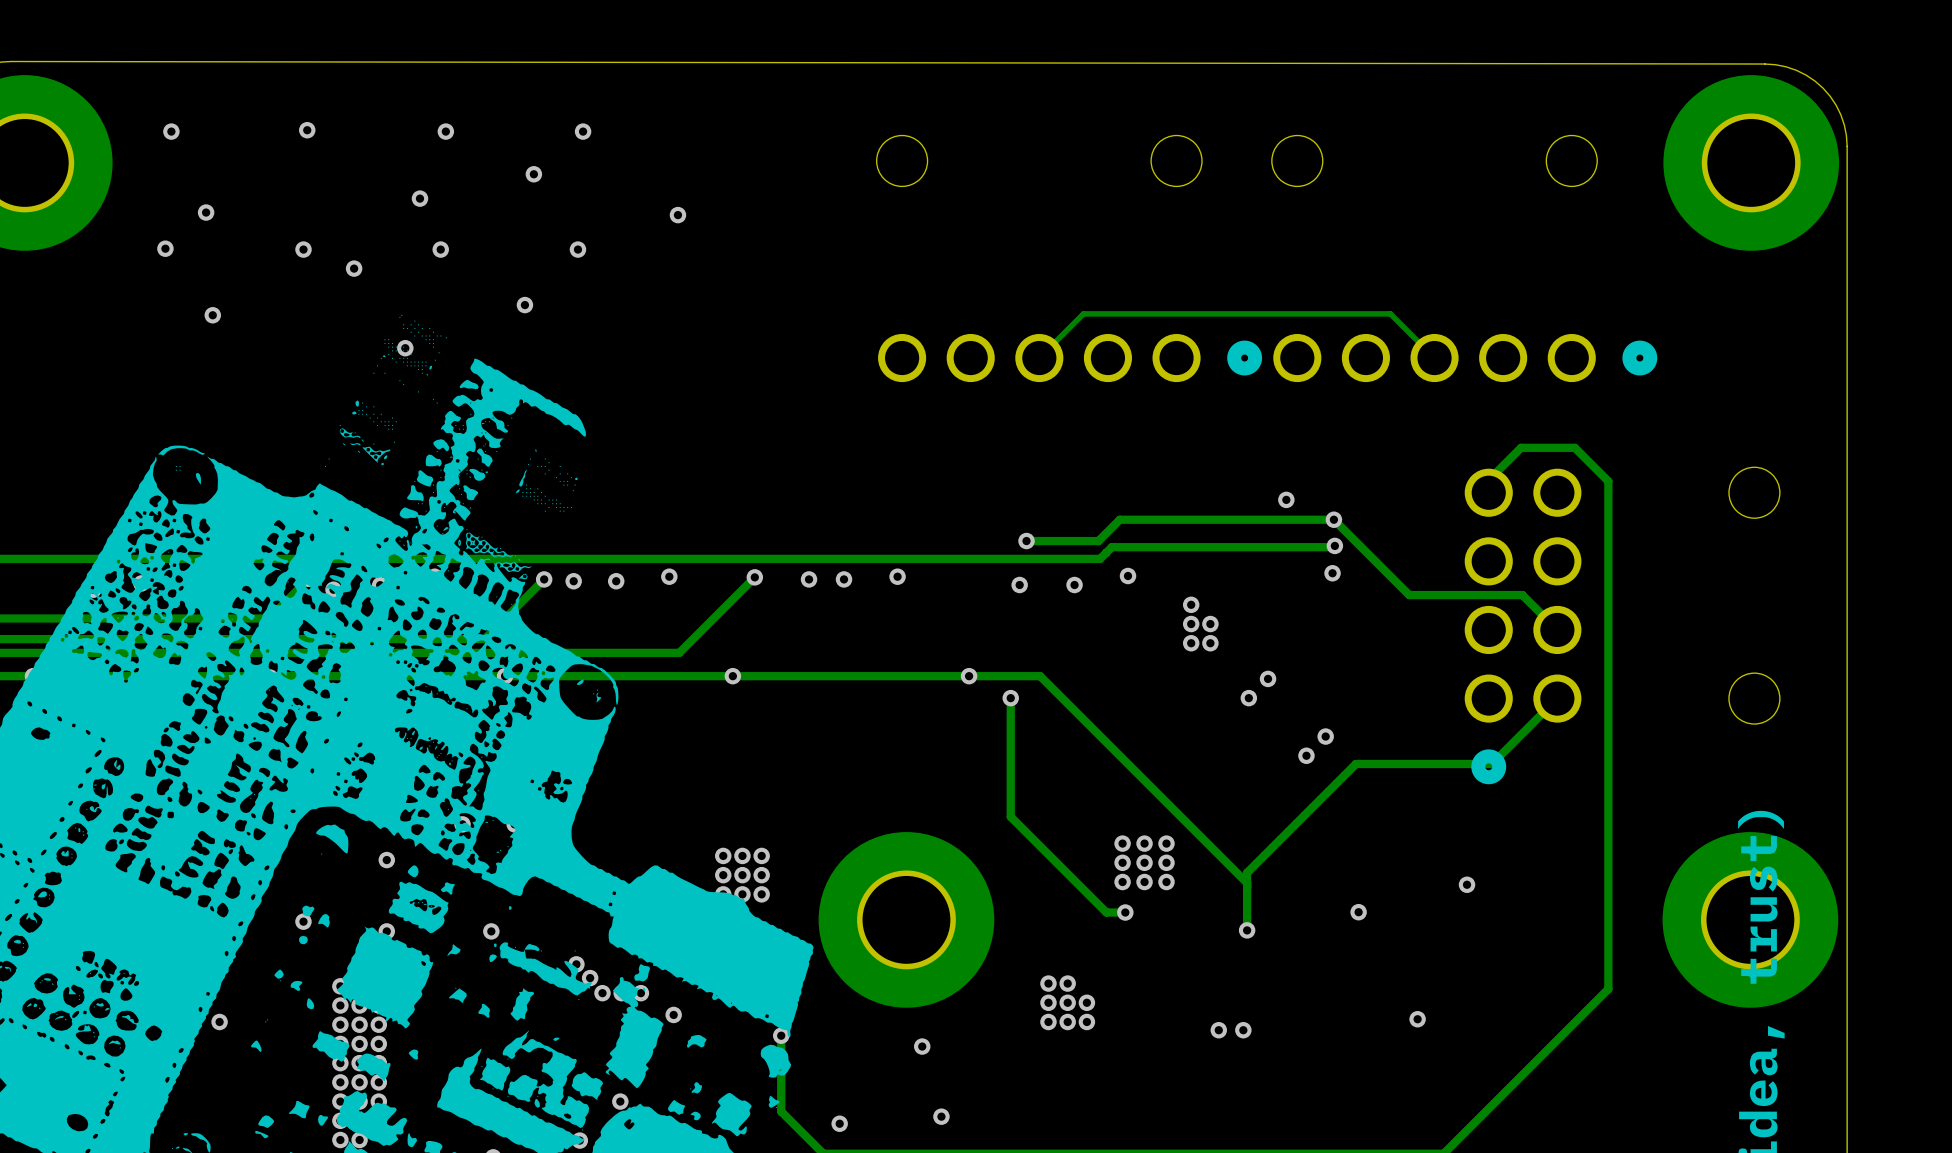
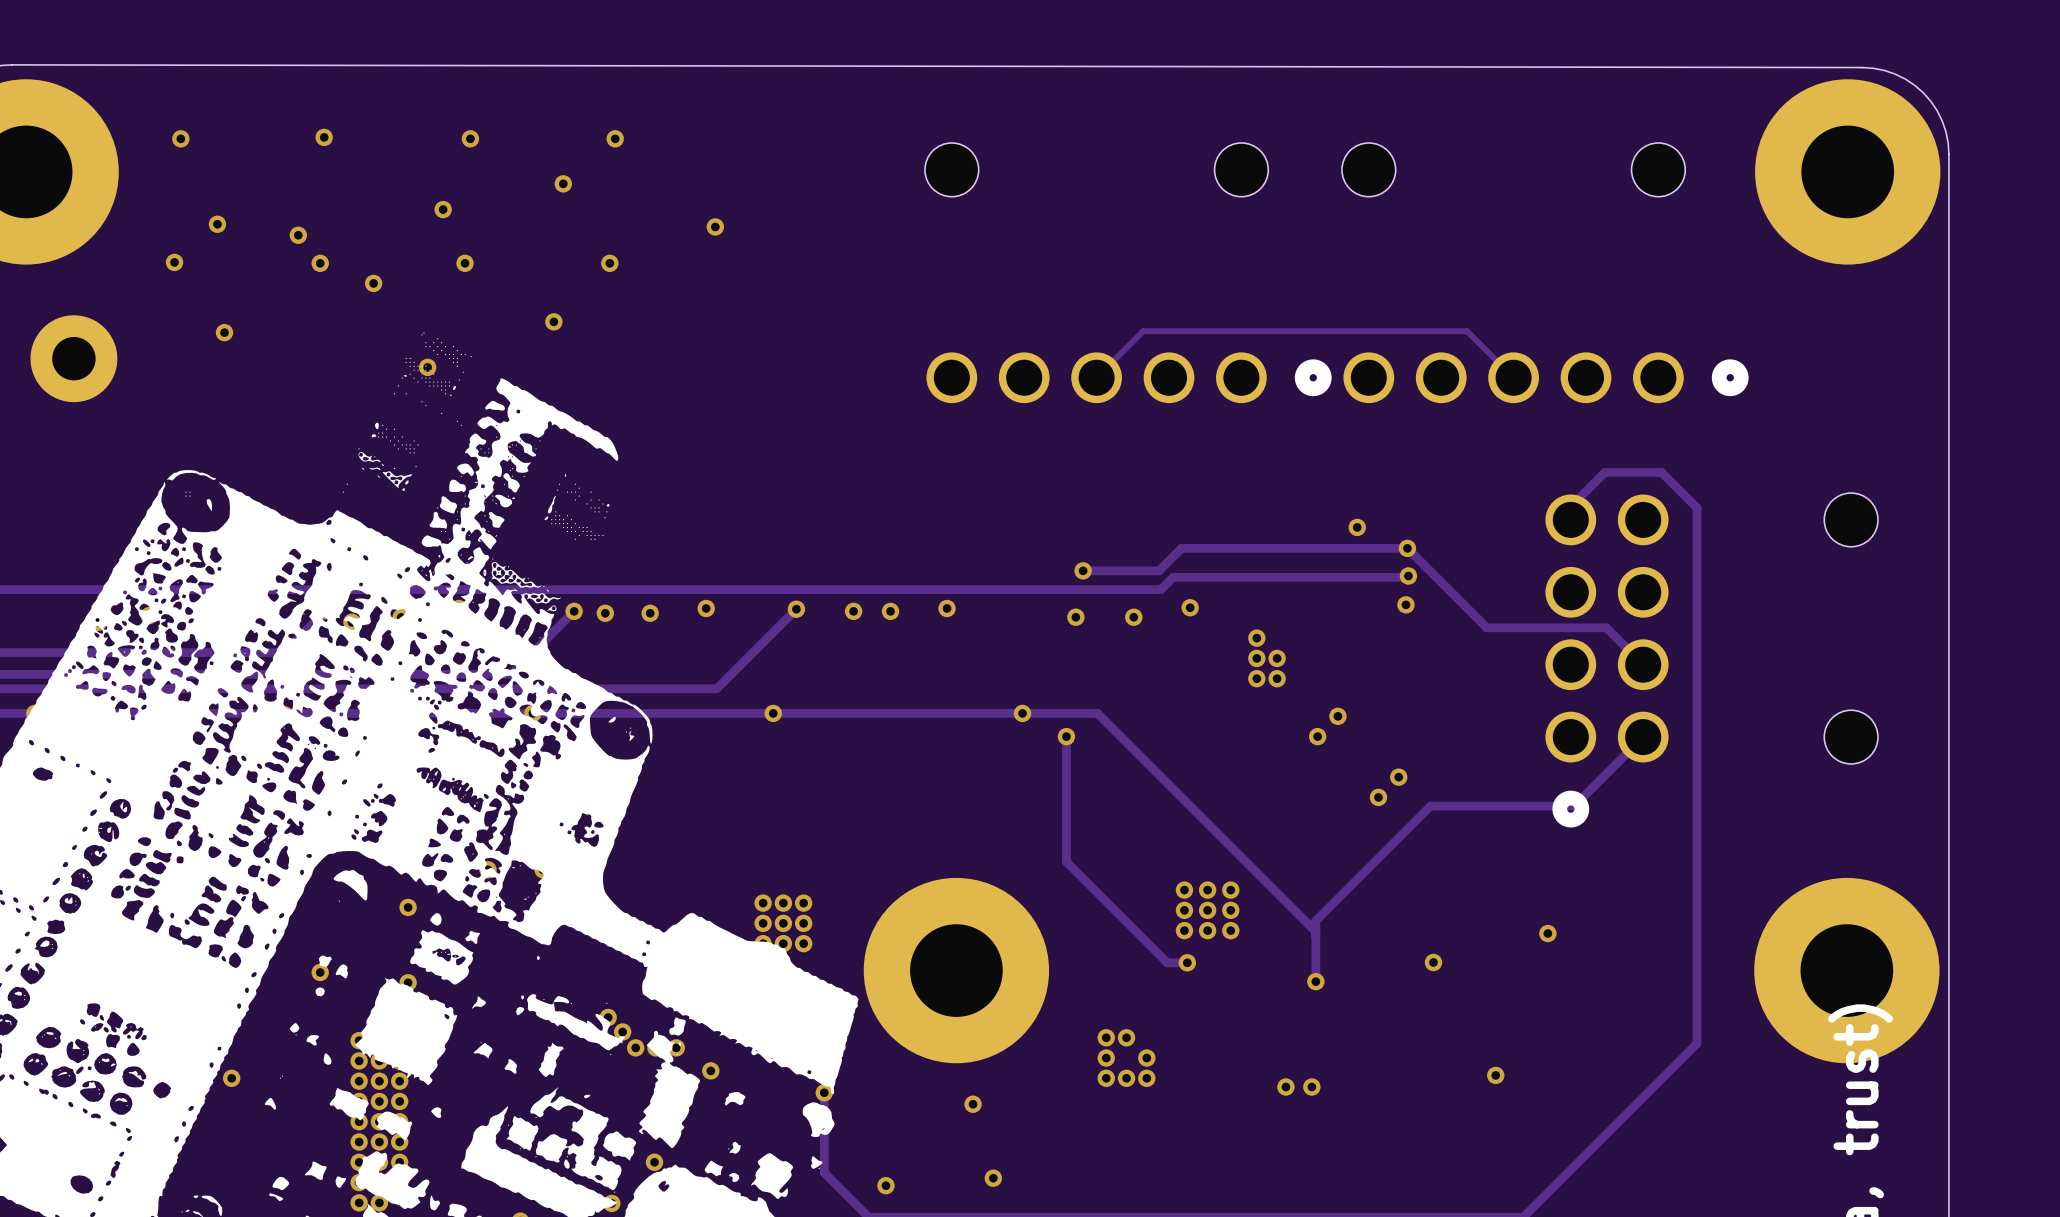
via: none -> (298, 235)
part: none -> (73, 358)
via: (491, 931) -> none
via: (1067, 1002) -> none

